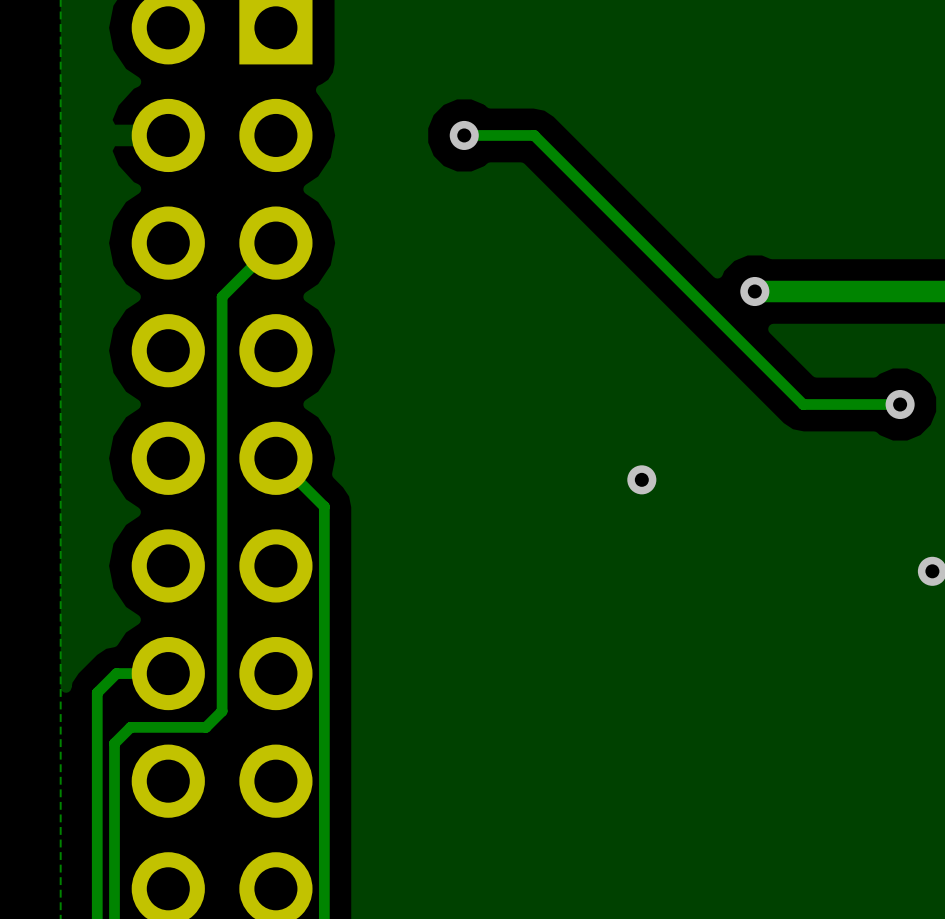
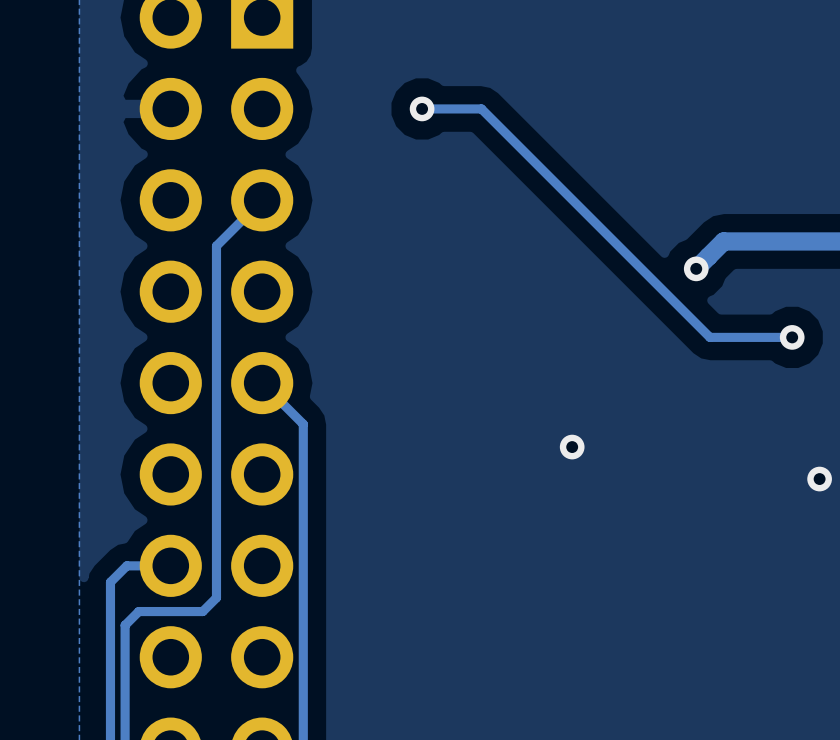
via position: (754, 291) -> (696, 268)
track: (819, 291) (754, 291) -> (723, 241) (696, 268)
via position: (641, 479) -> (572, 447)

